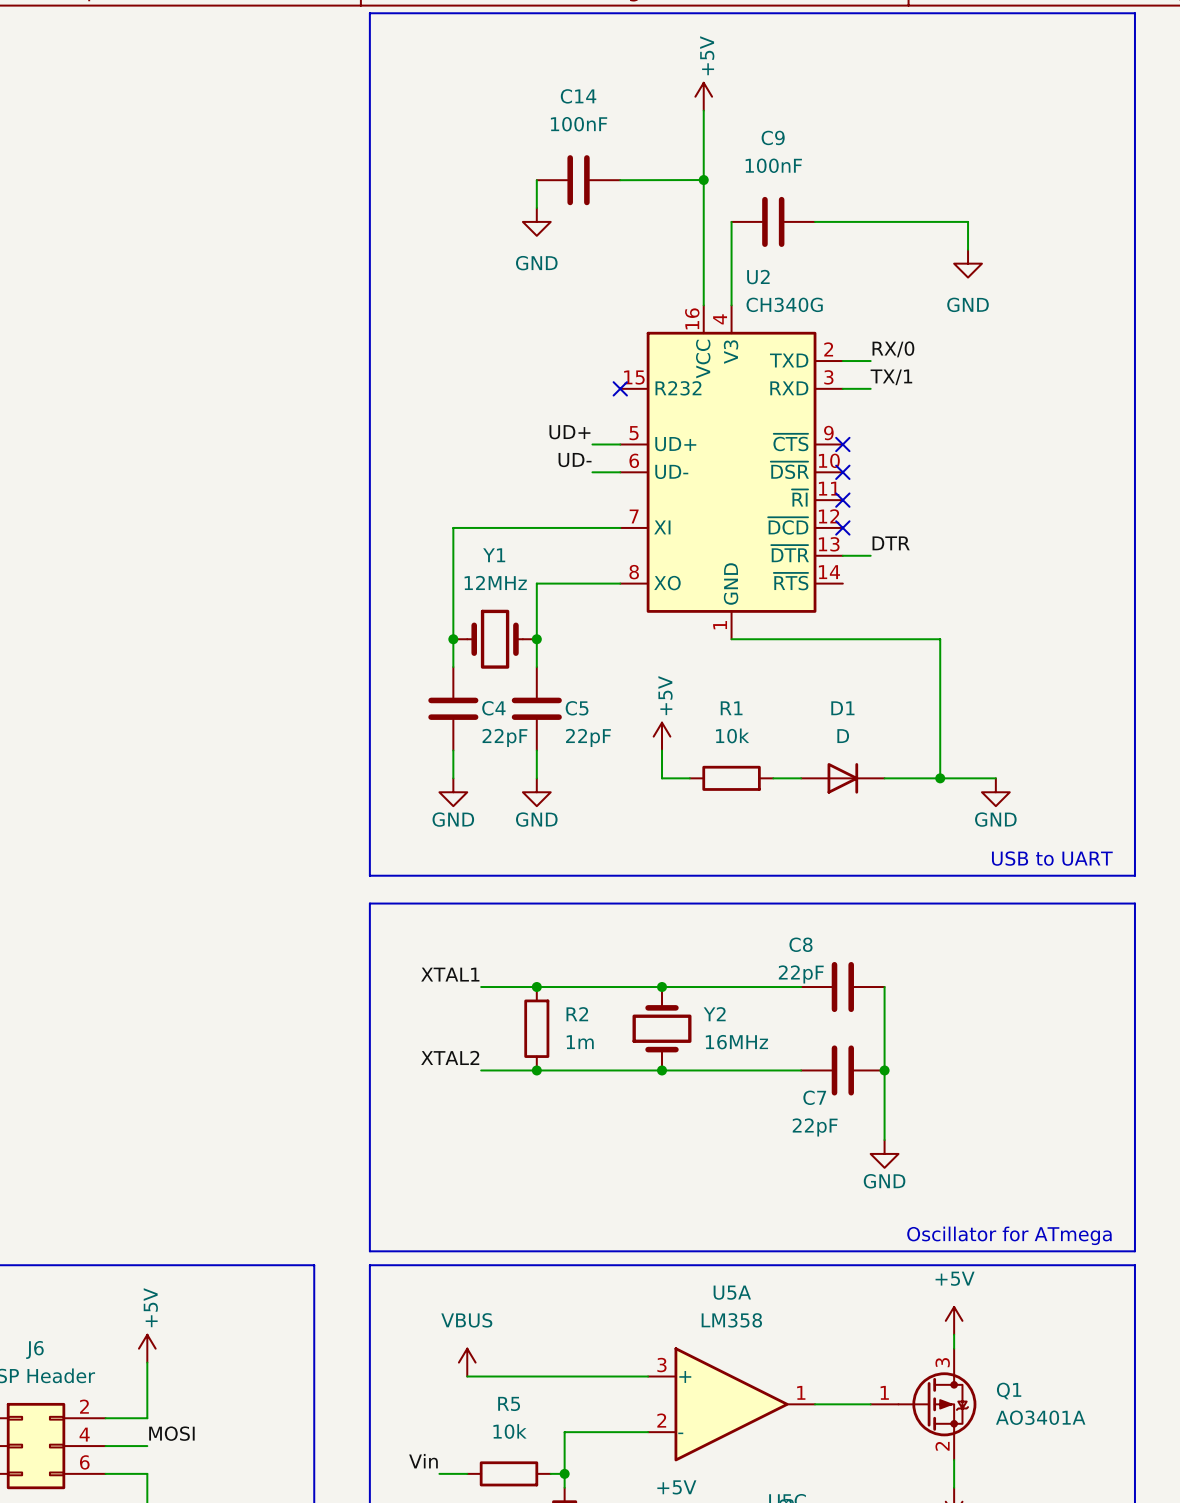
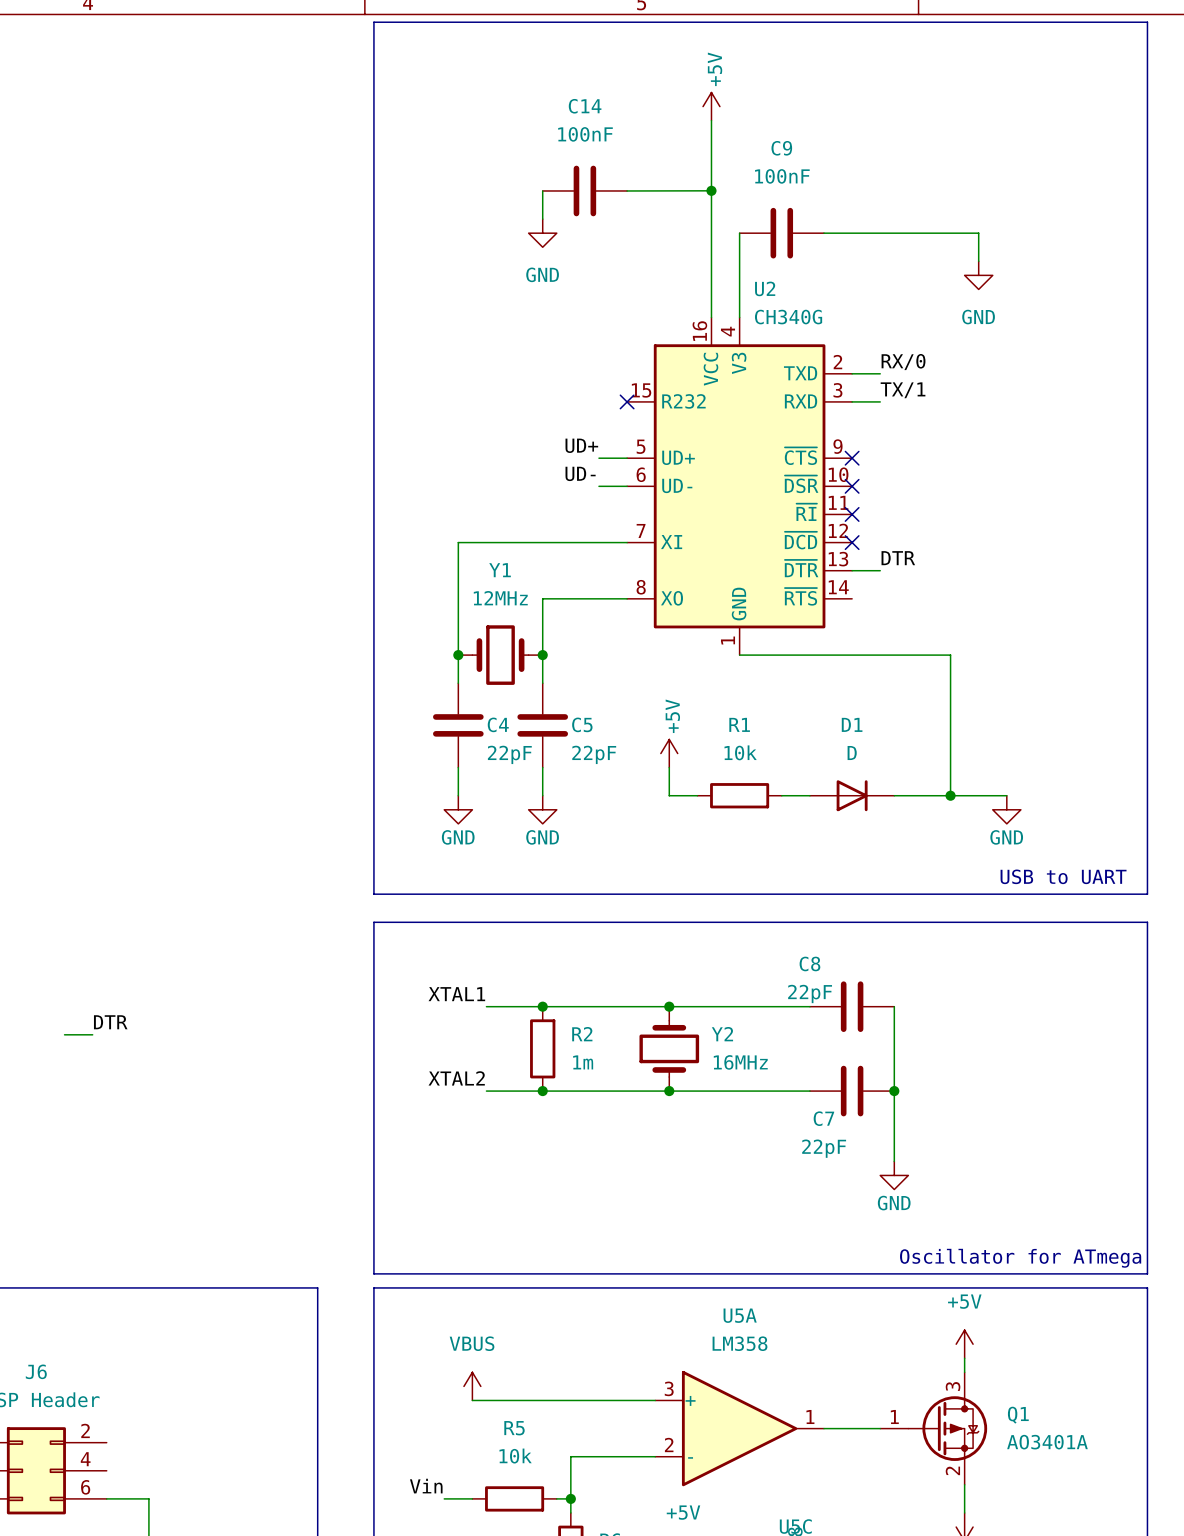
label: none -> DTR (110, 1022)
wire: none -> (64, 1034) (92, 1034)
power symbol: +5V (147, 1348) -> none
wire: (147, 1362) (147, 1418) (105, 1418) -> none
label: MOSI (171, 1433) -> none
wire: (105, 1446) (147, 1446) -> none

